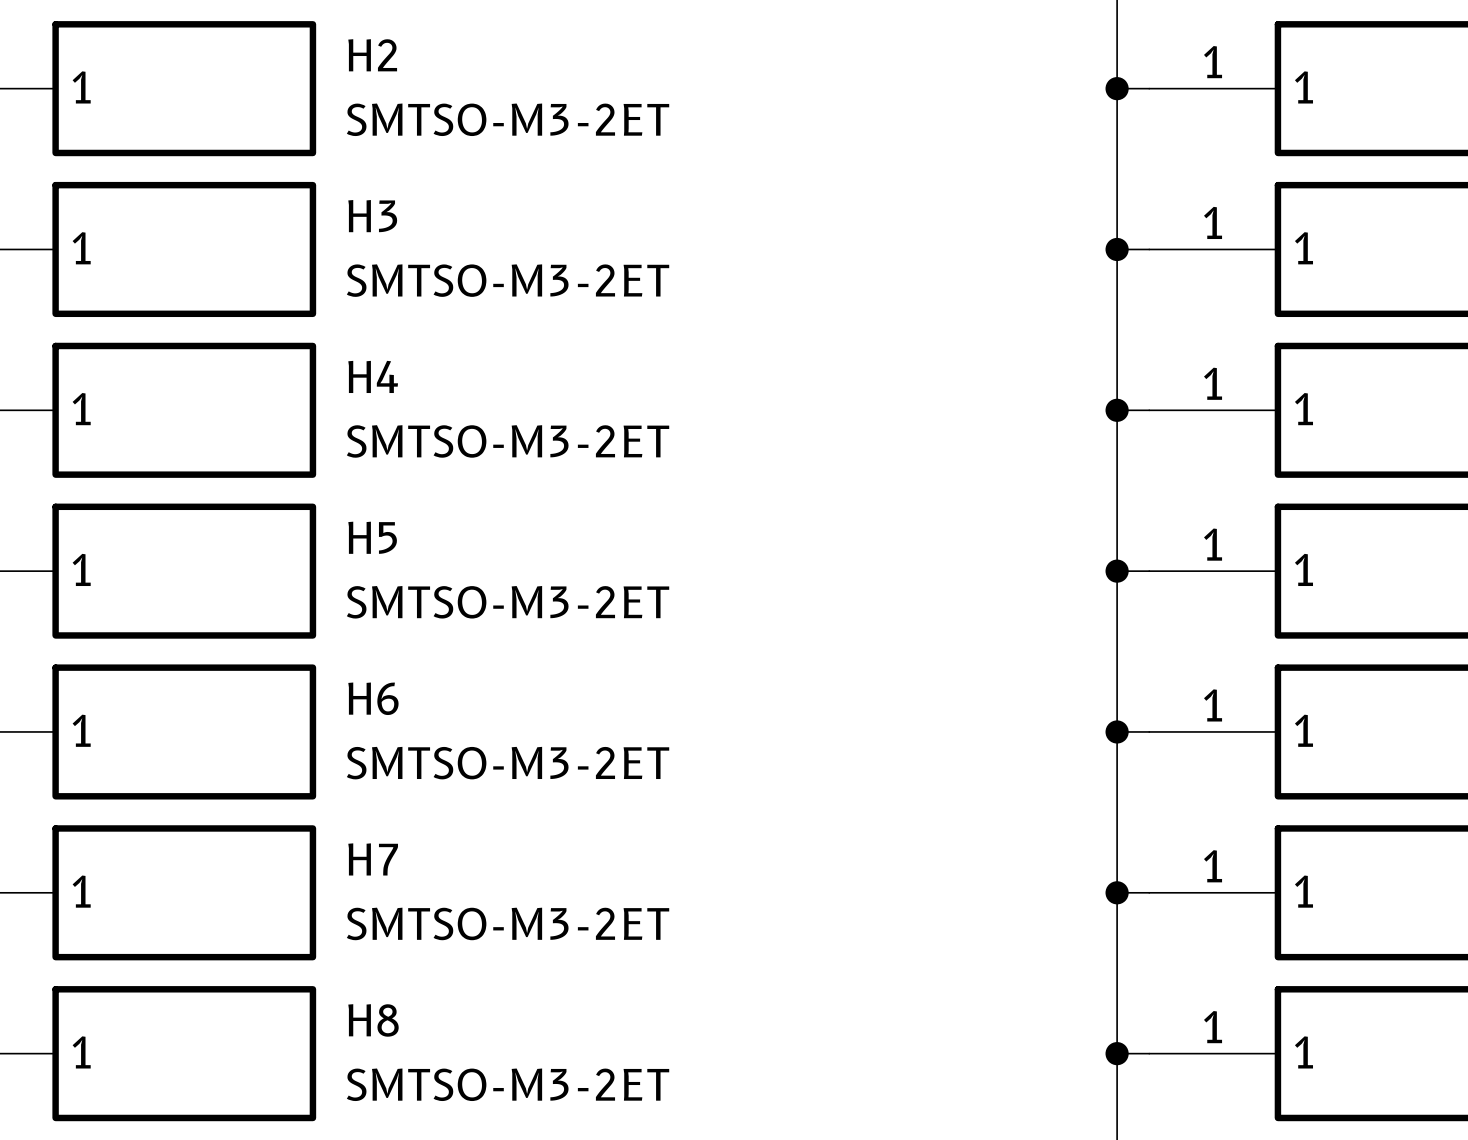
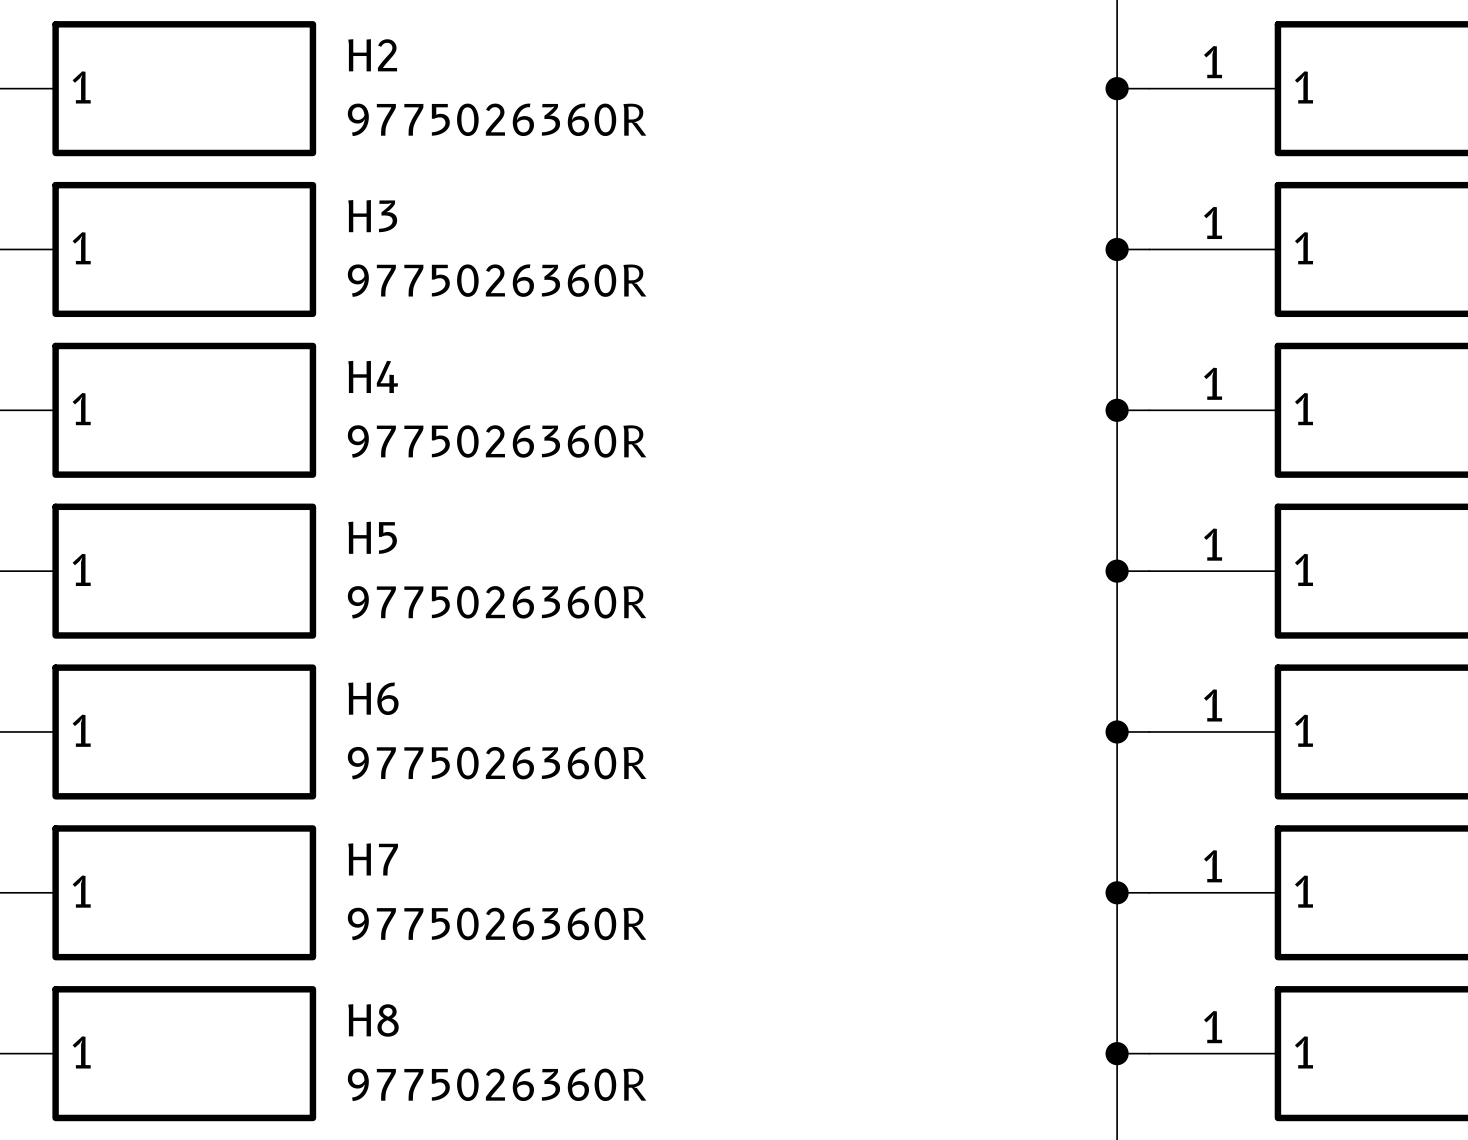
H2 value: SMTSO-M3-2ET (508, 119) -> 9775026360R (497, 119)
H3 value: SMTSO-M3-2ET (508, 280) -> 9775026360R (497, 280)
H4 value: SMTSO-M3-2ET (508, 441) -> 9775026360R (497, 441)
H5 value: SMTSO-M3-2ET (508, 602) -> 9775026360R (497, 602)
H6 value: SMTSO-M3-2ET (508, 763) -> 9775026360R (497, 763)
H7 value: SMTSO-M3-2ET (508, 923) -> 9775026360R (497, 923)
H8 value: SMTSO-M3-2ET (508, 1084) -> 9775026360R (497, 1084)

